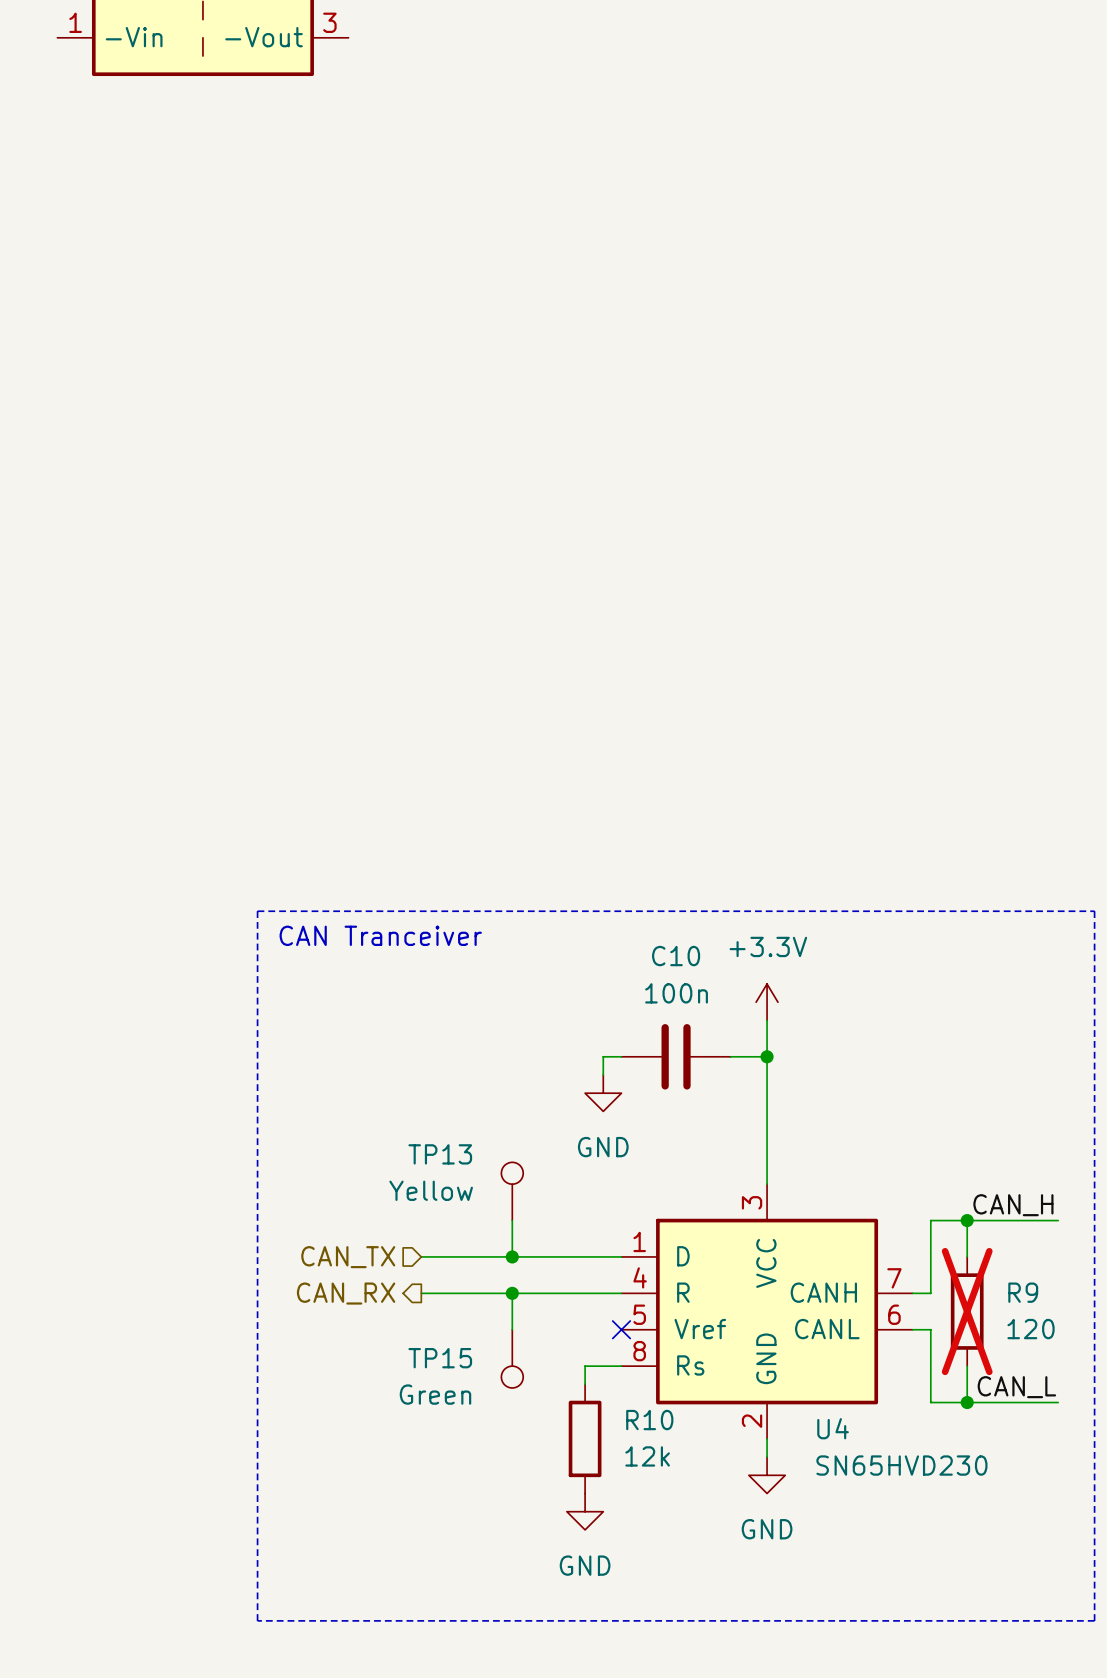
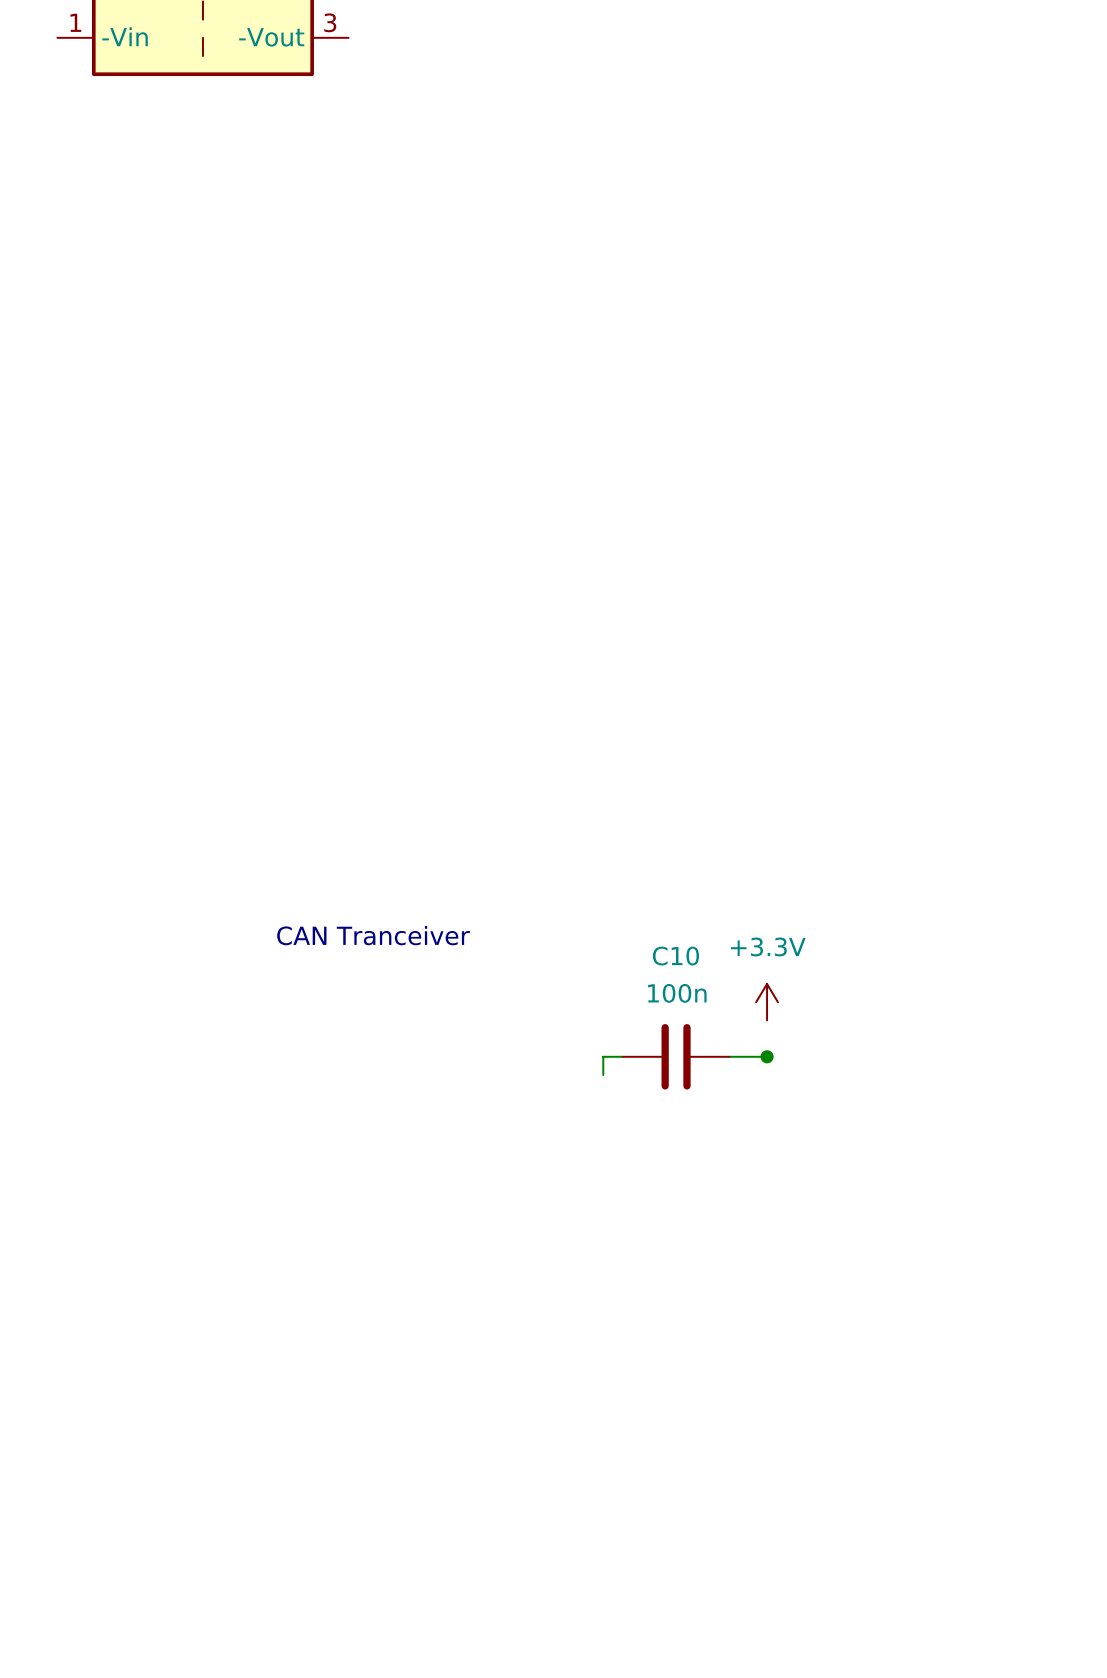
line: (257, 911) (1094, 911) (1094, 1620) (257, 1620) (257, 911) -> none
wire: (767, 1020) (767, 1184) -> none
power symbol: GND (603, 1093) -> none
TP13: Yellow (512, 1191) -> none
label: CAN_H (1013, 1205) -> none
wire: (512, 1220) (512, 1256) -> none
wire: (967, 1220) (967, 1256) -> none
junction: (967, 1220) -> none
wire: (1058, 1220) (930, 1220) (930, 1293) (912, 1293) -> none
wire: (421, 1256) (621, 1256) -> none
junction: (512, 1256) -> none
hierarchical label: CAN_TX (348, 1257) -> none
hierarchical label: CAN_RX (346, 1293) -> none
wire: (421, 1293) (621, 1293) -> none
wire: (512, 1293) (512, 1329) -> none
junction: (512, 1293) -> none
U4: SN65HVD230 (767, 1311) -> none
R9: 120 (967, 1311) -> none
no-connect mark: (621, 1329) -> none
wire: (912, 1329) (930, 1329) (930, 1402) (1058, 1402) -> none
TP15: Green (512, 1358) -> none
wire: (621, 1366) (585, 1366) (585, 1384) -> none
wire: (967, 1366) (967, 1402) -> none
label: CAN_L (1016, 1387) -> none
junction: (967, 1402) -> none
R10: 12k (585, 1438) -> none
wire: (767, 1438) (767, 1457) -> none
power symbol: GND (767, 1475) -> none
power symbol: GND (585, 1511) -> none

